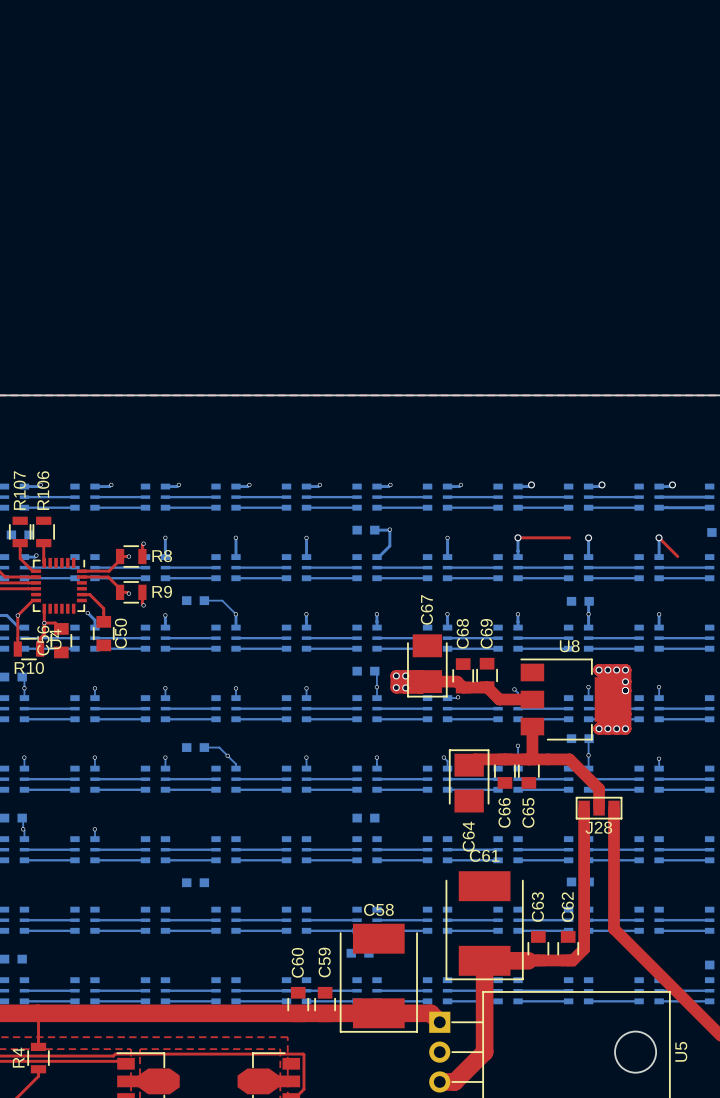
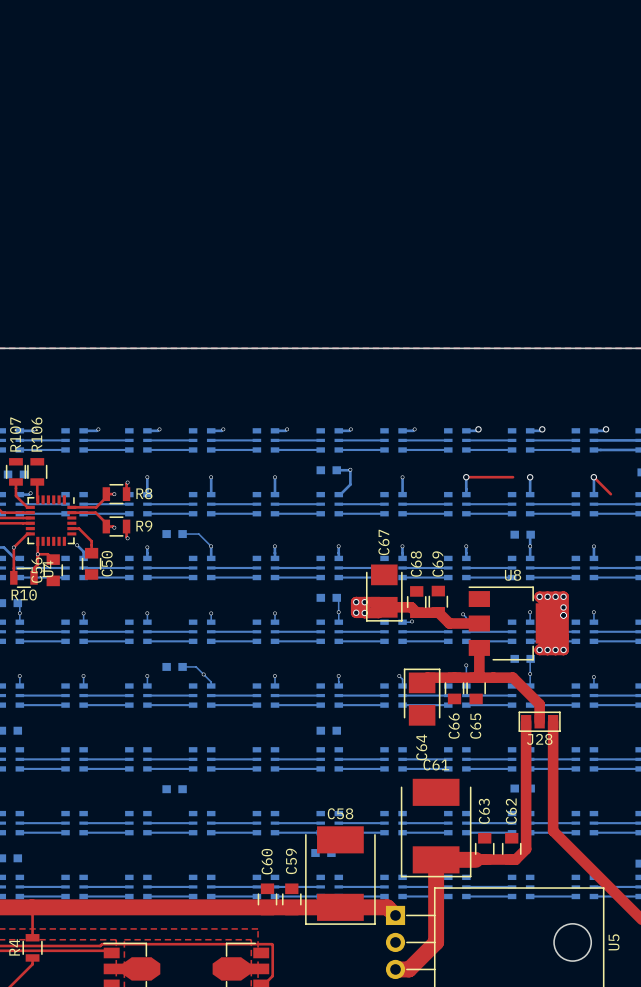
bottom track: (22, 818) (24, 839) -> none
via: (23, 829) -> none
bottom track: (94, 829) (94, 839) -> none
via: (94, 829) -> none

